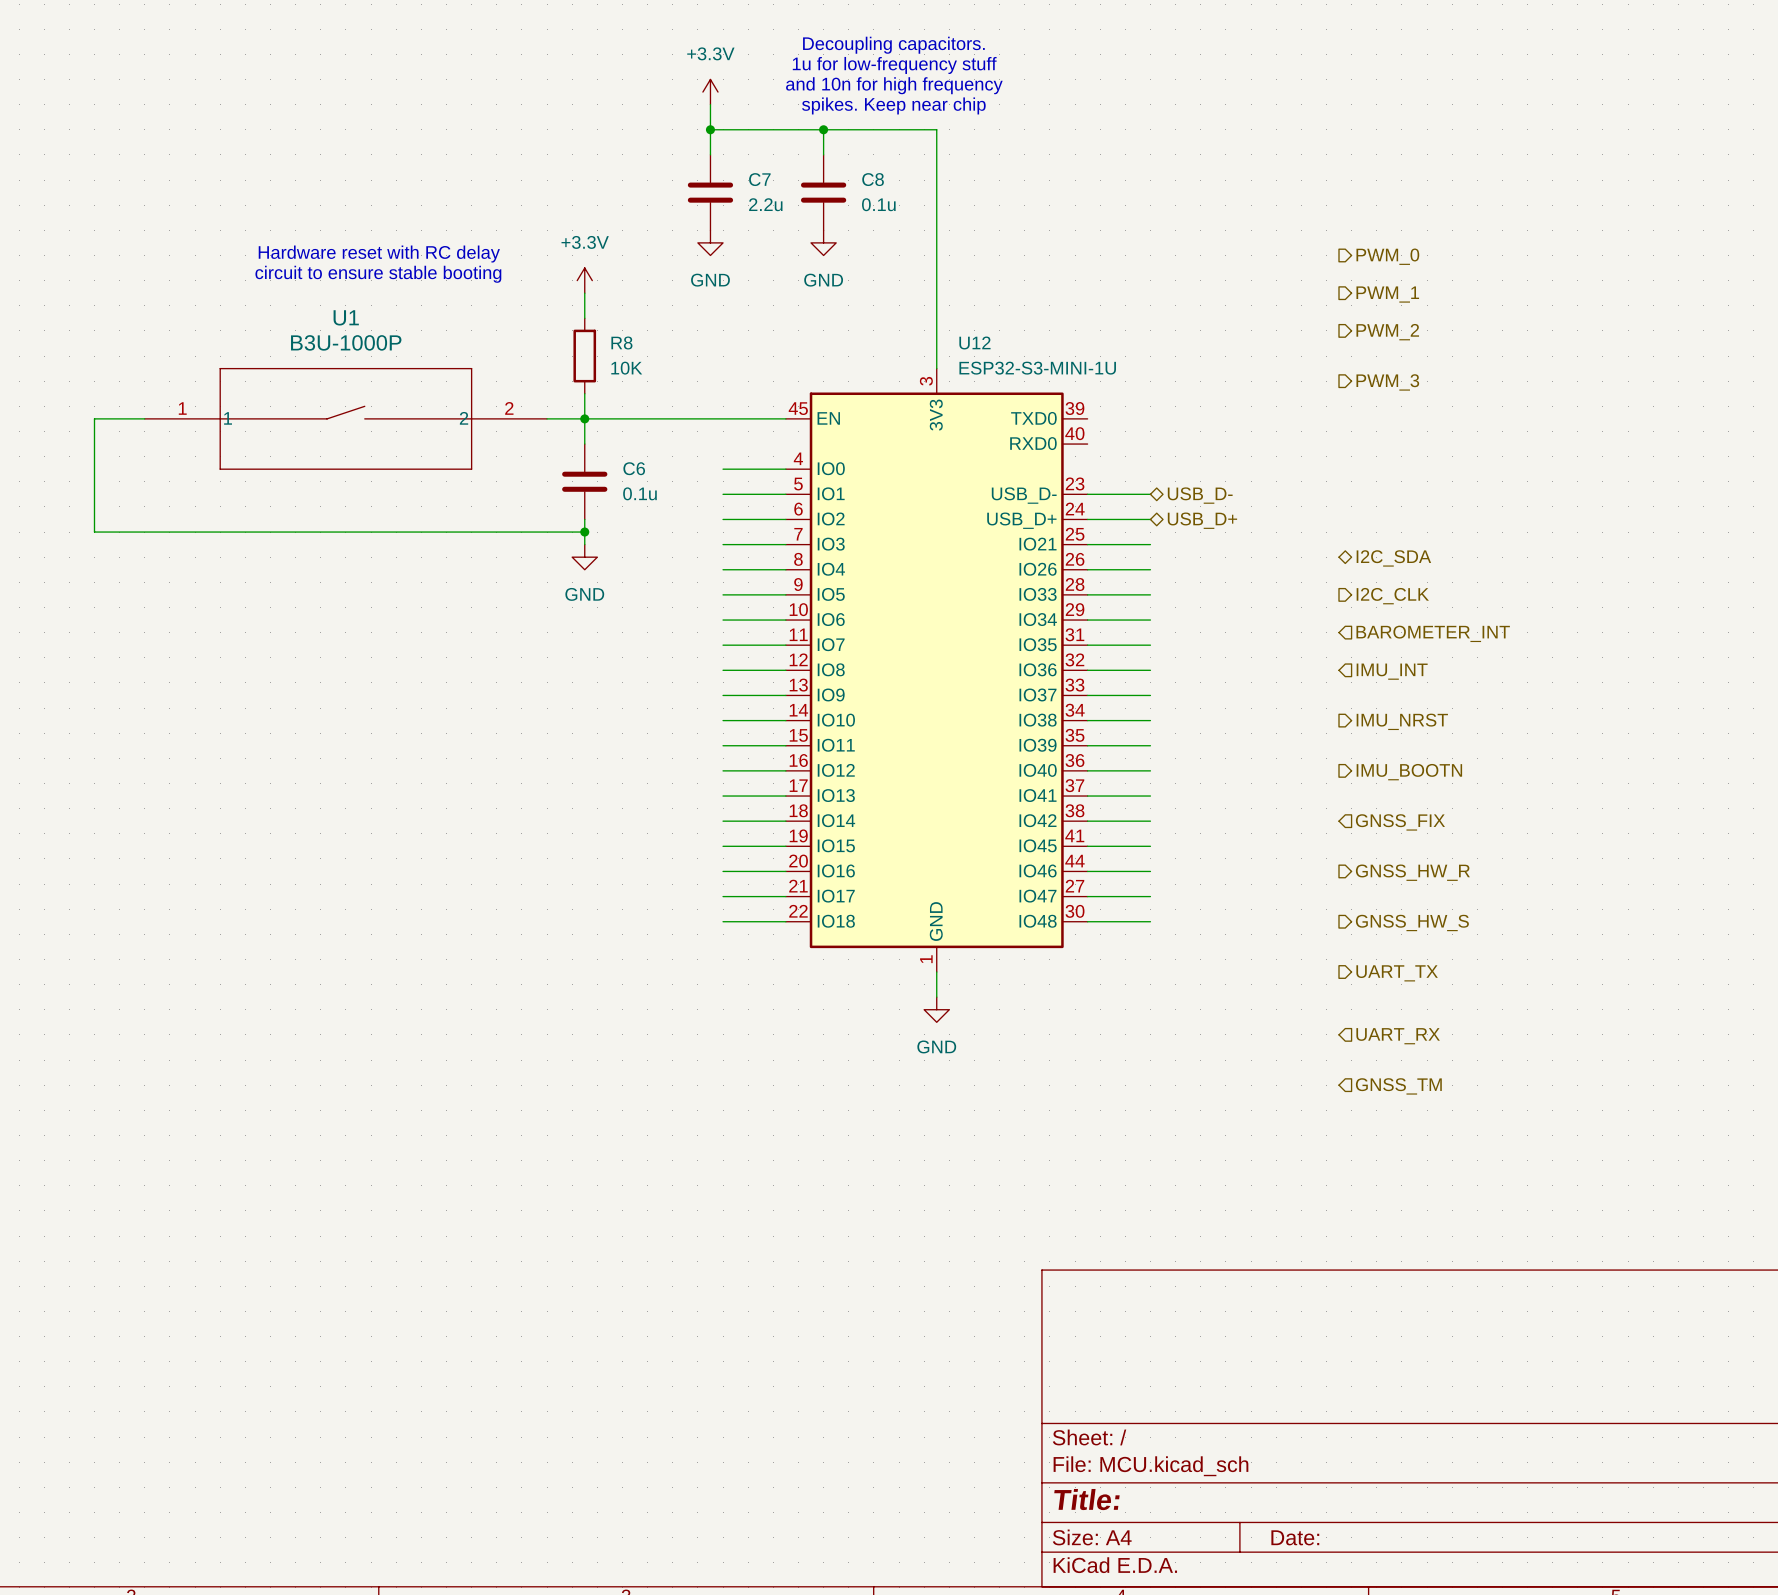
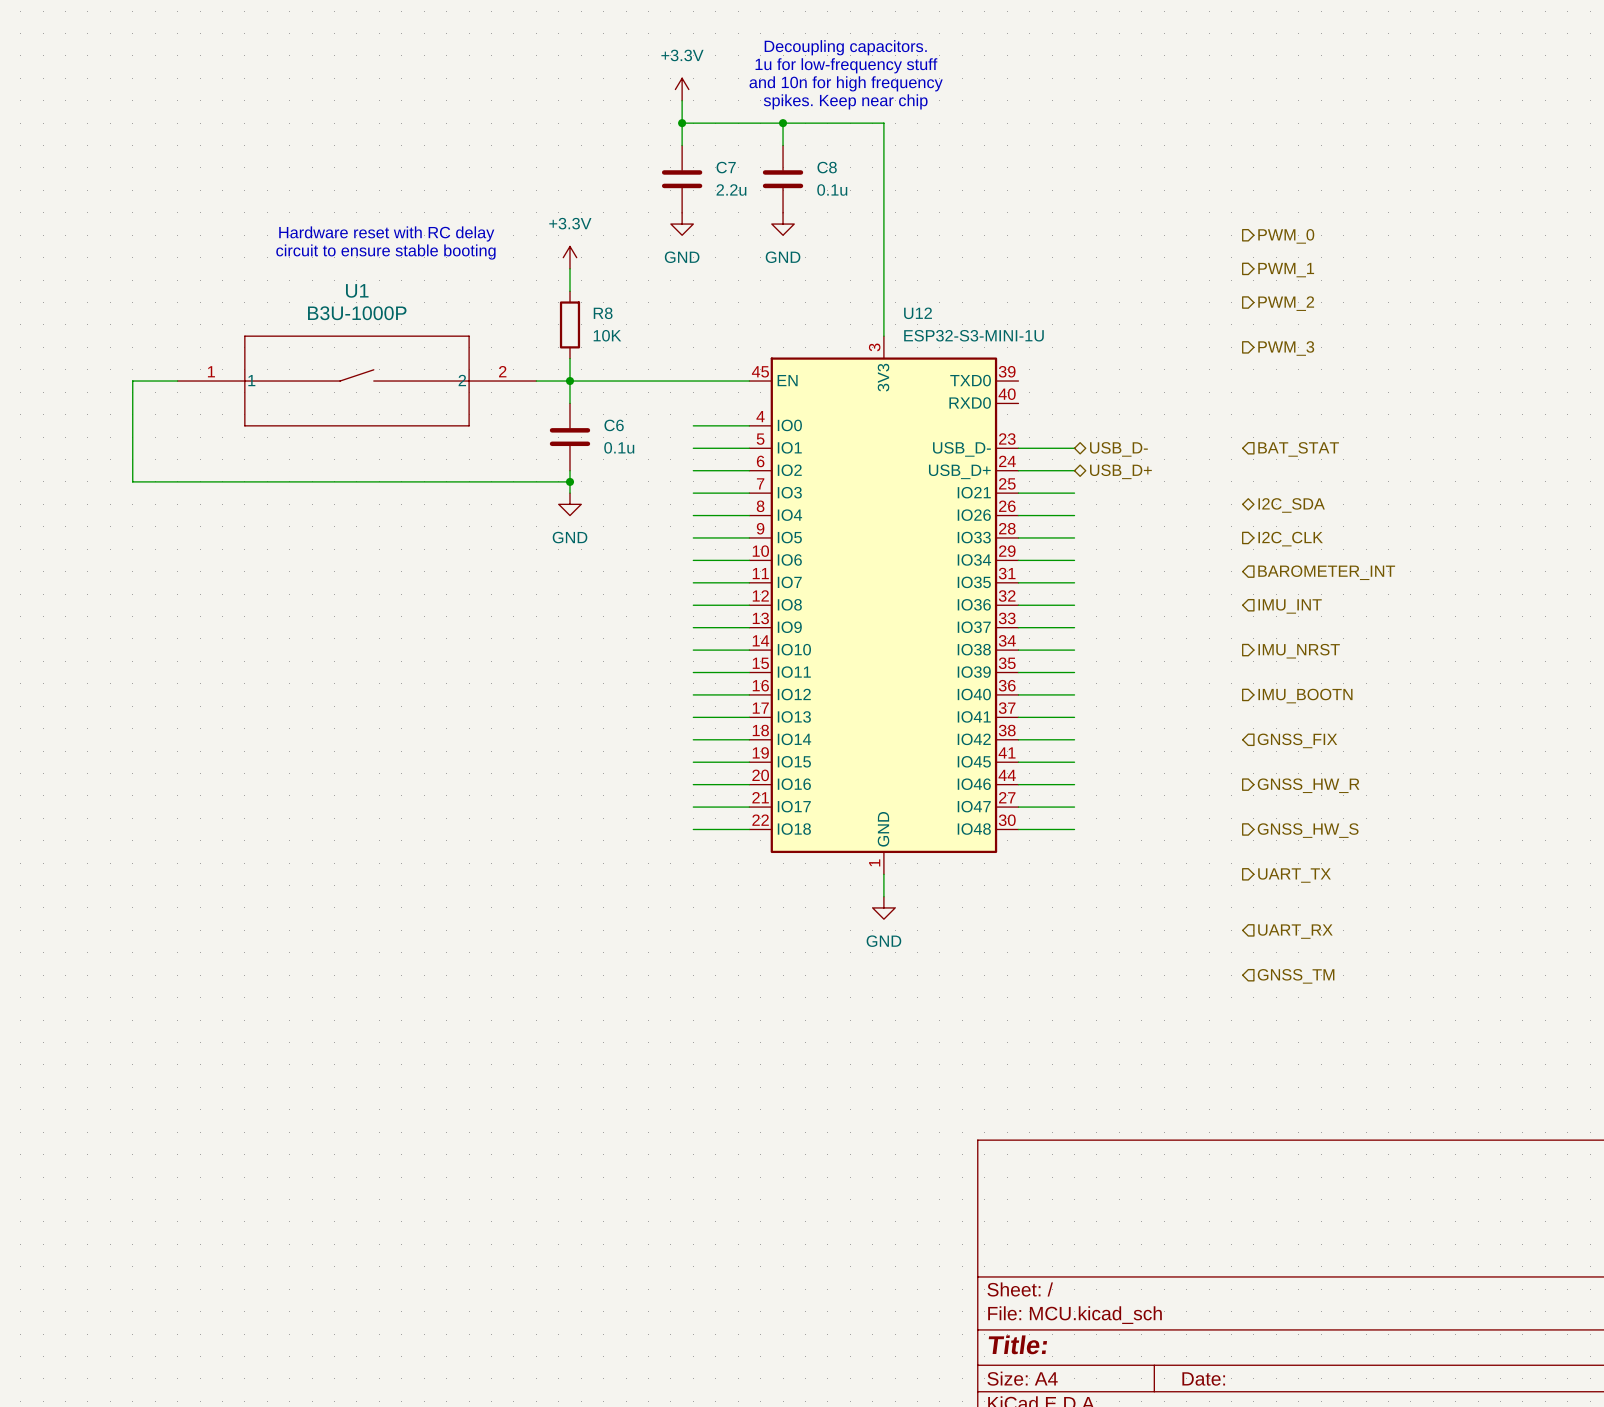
hierarchical label: none -> BAT_STAT (1298, 449)

